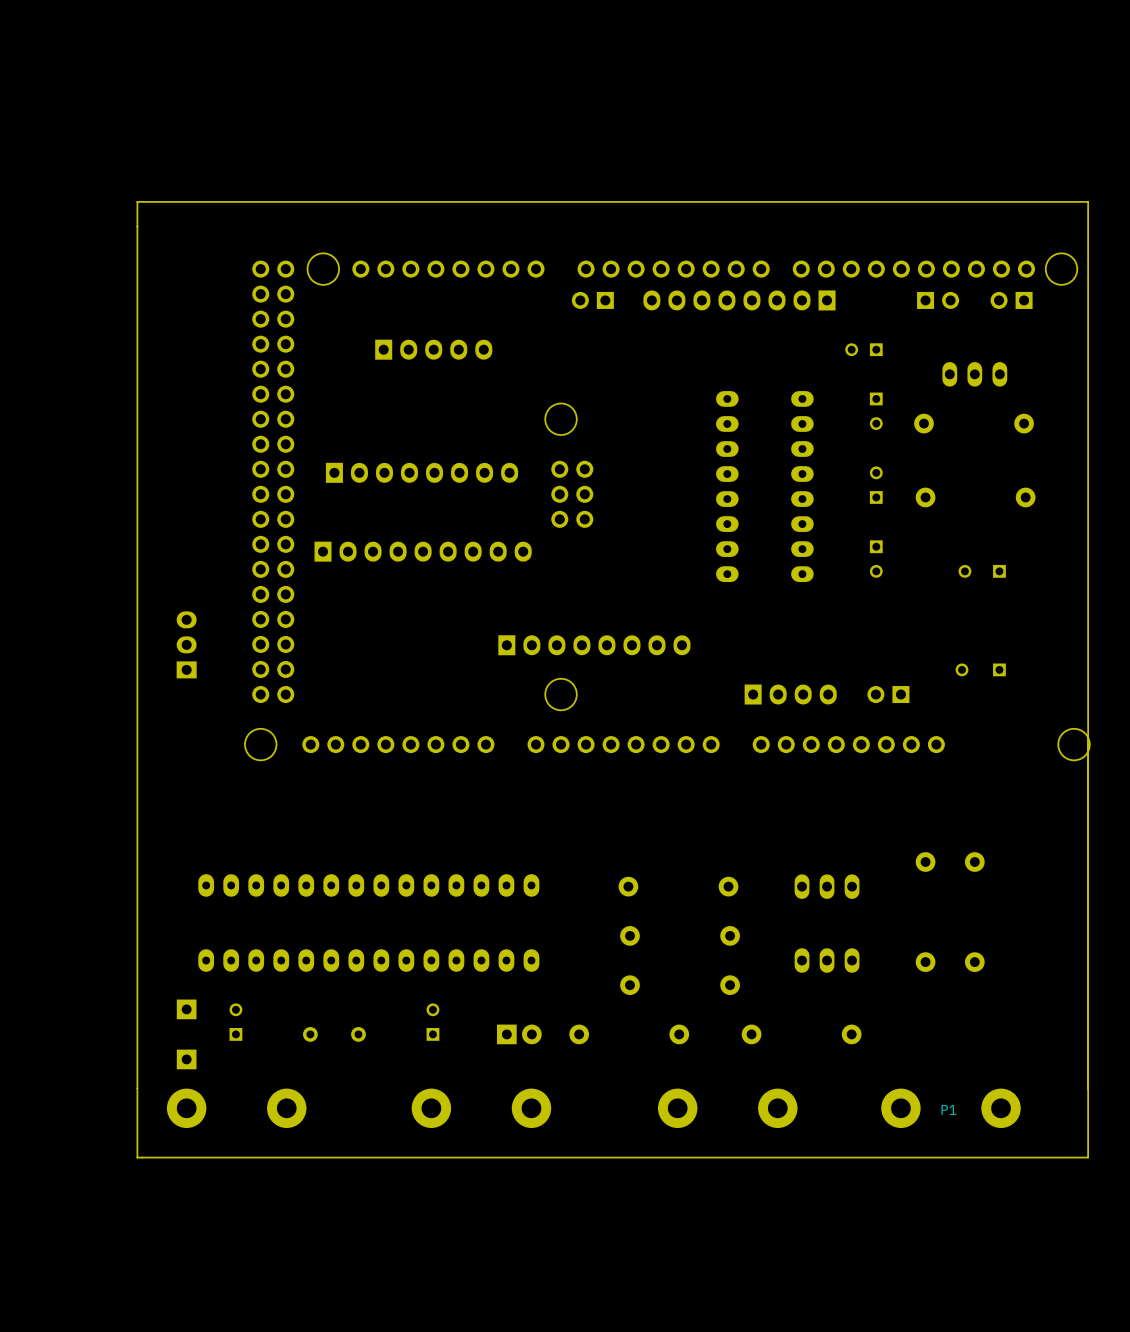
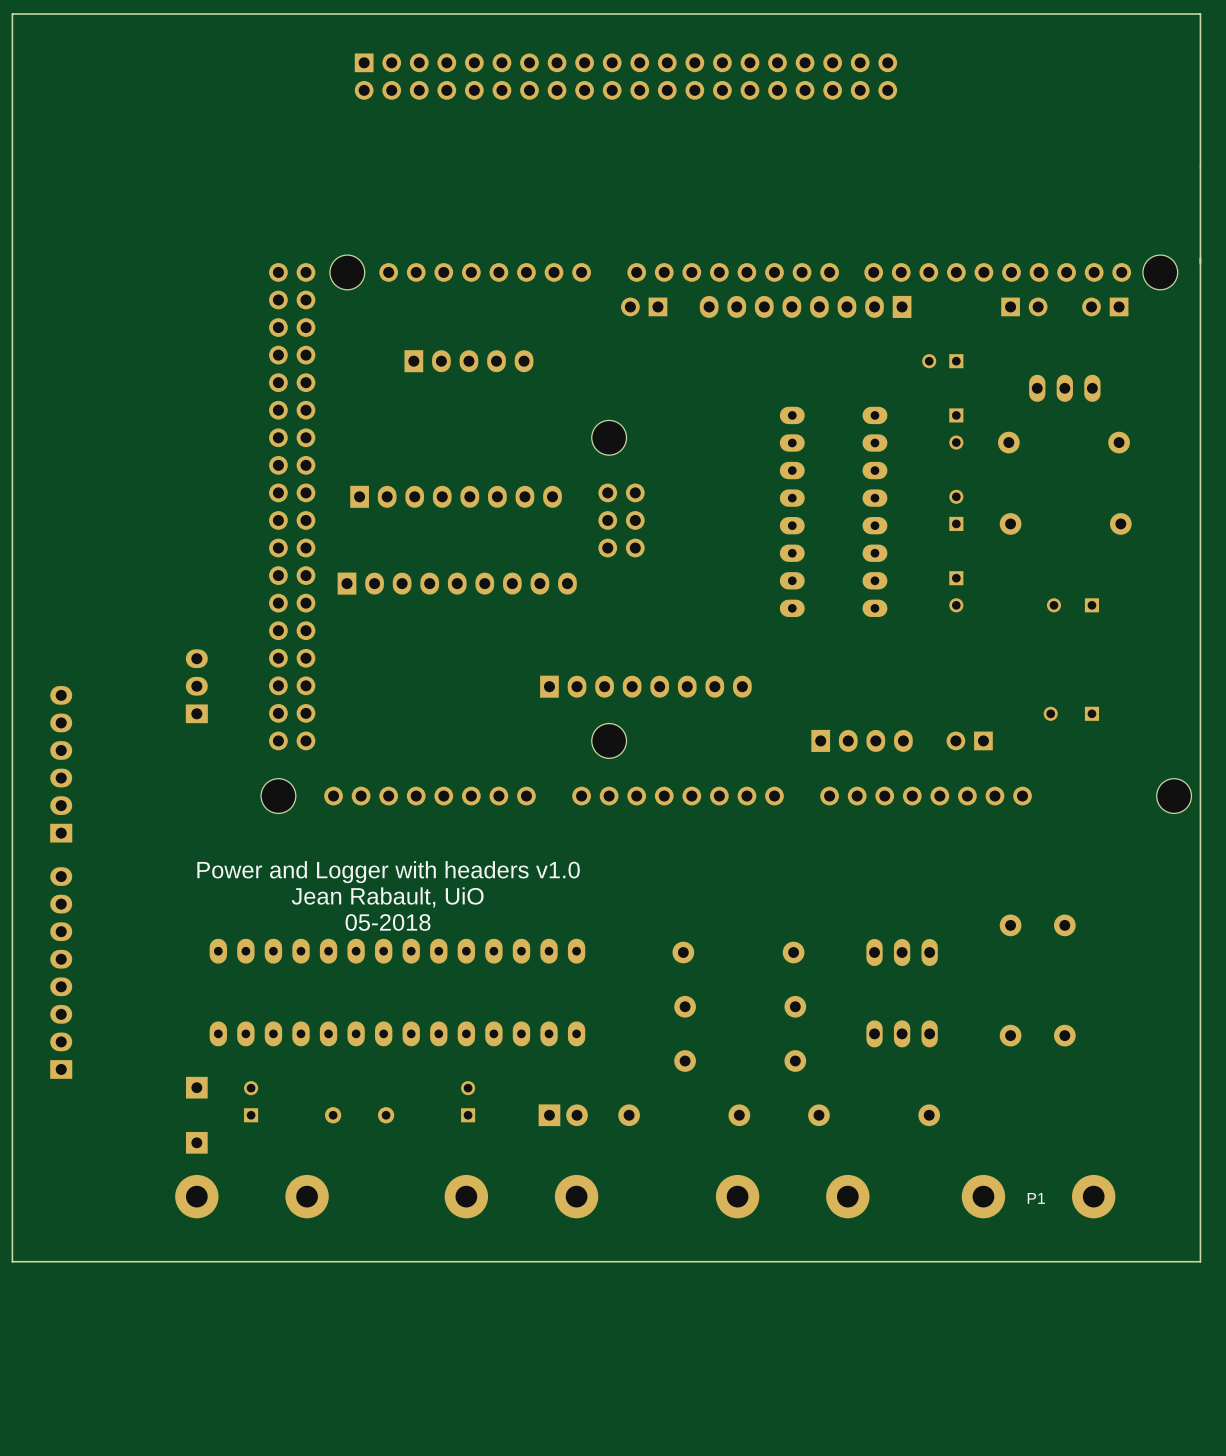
part: none -> (625, 76)
board edge: (1088, 201) (1088, 1157) (137, 1157) (137, 201) (1088, 201) -> (1200, 13) (1200, 1261) (12, 1261) (12, 13) (1200, 13)
part: none -> (61, 764)
text: none -> Power and Logger with headers v1.0 (388, 872)
text: none -> Jean Rabault, UiO (387, 897)
text: none -> 05-2018 (388, 922)
part: none -> (61, 973)

